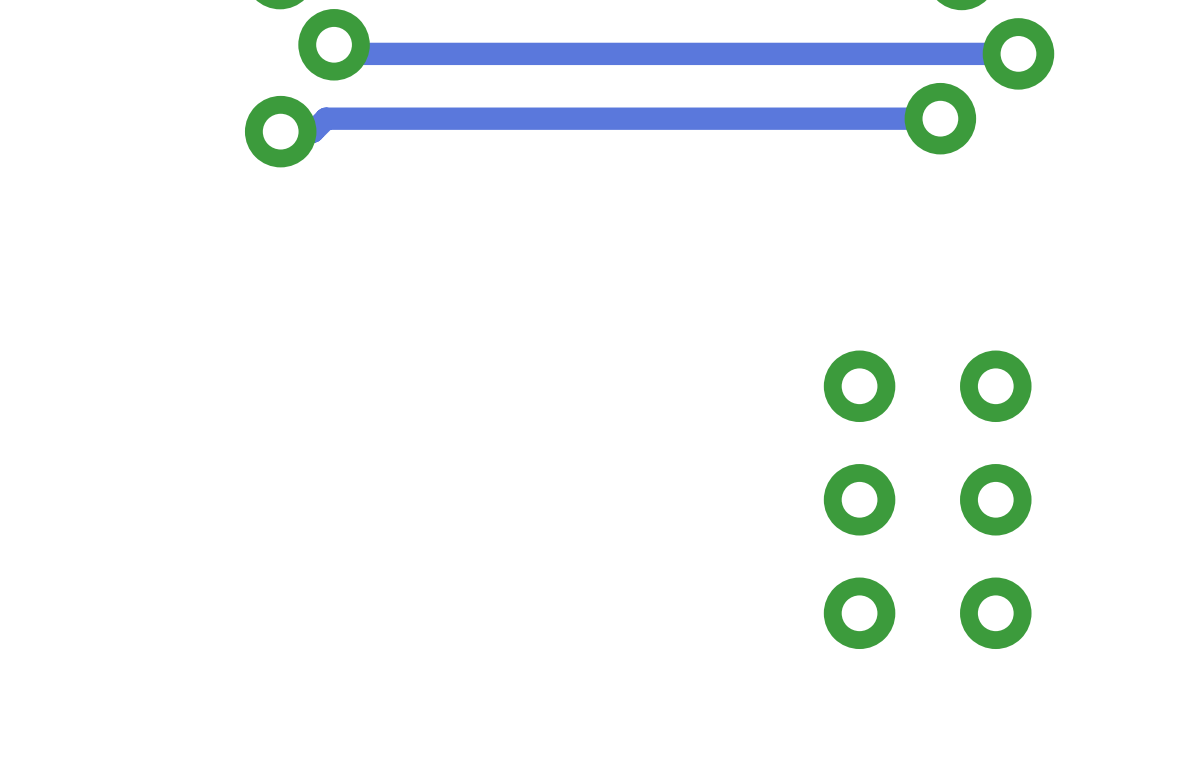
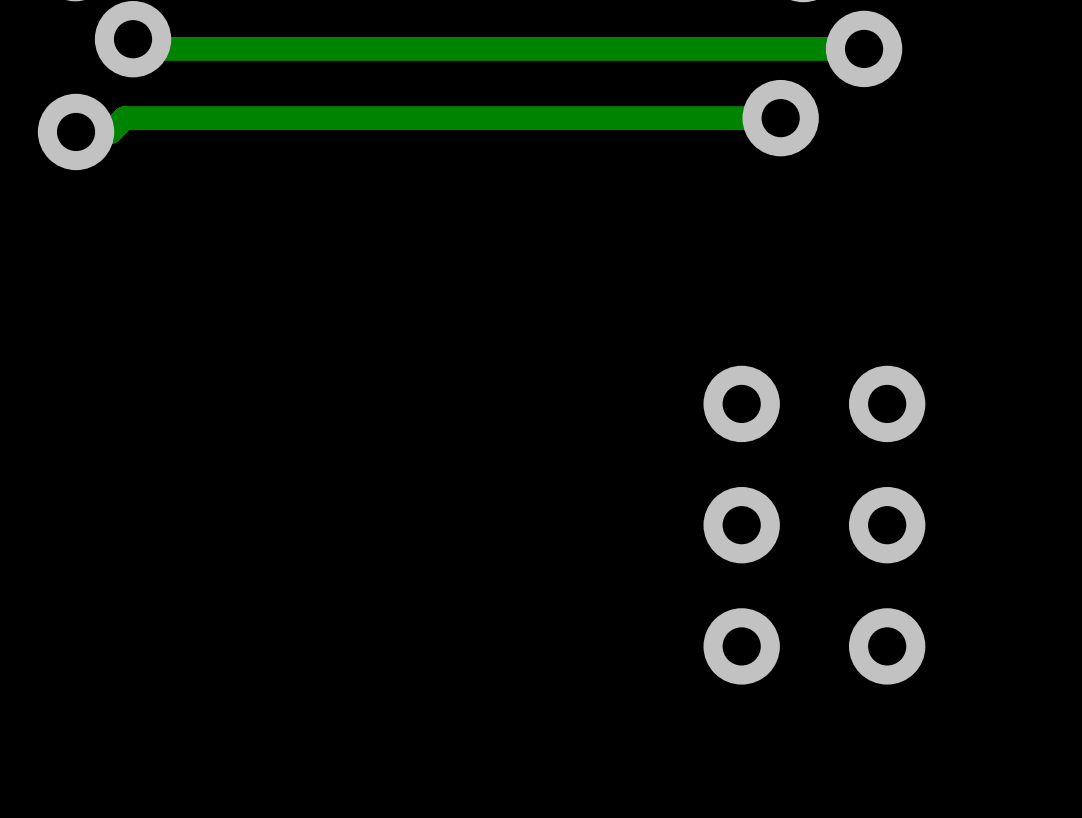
via position: (859, 386) -> (741, 403)
via position: (995, 386) -> (887, 403)
via position: (859, 499) -> (741, 525)
via position: (995, 499) -> (887, 525)
via position: (859, 613) -> (741, 646)
via position: (995, 613) -> (887, 646)

